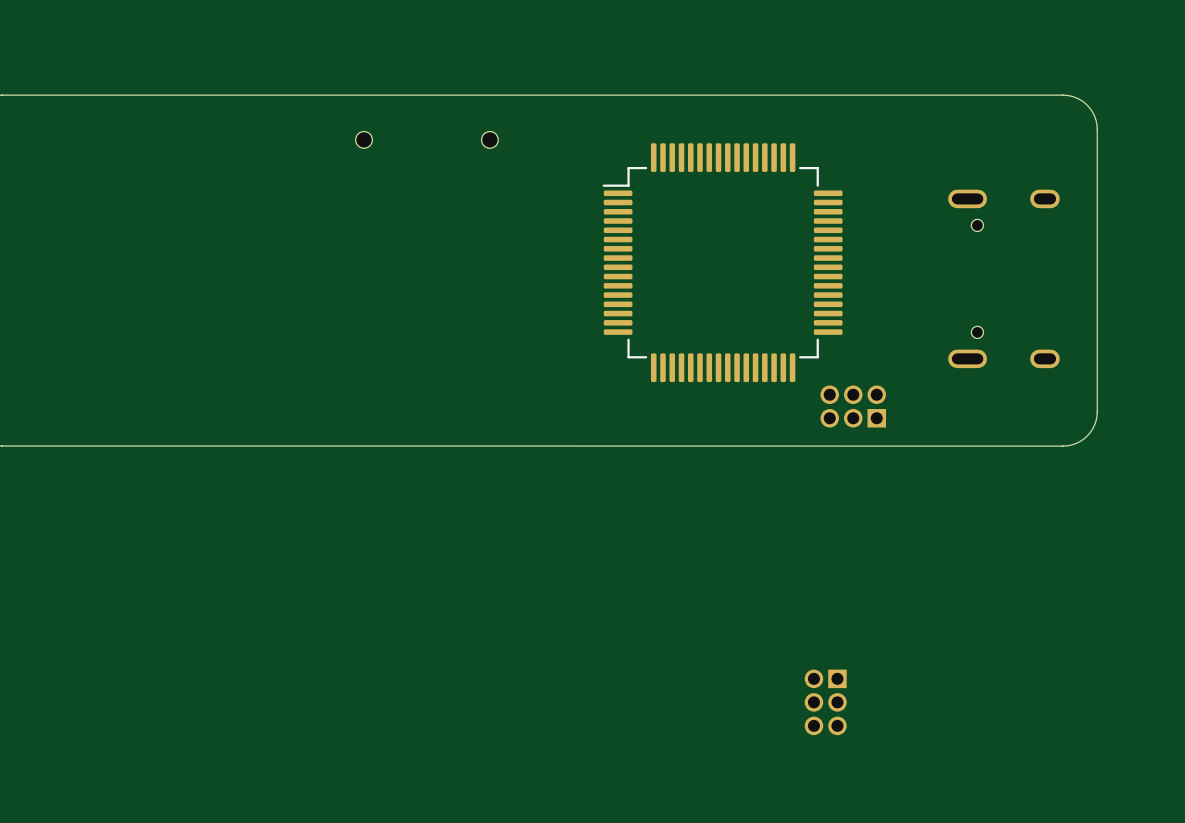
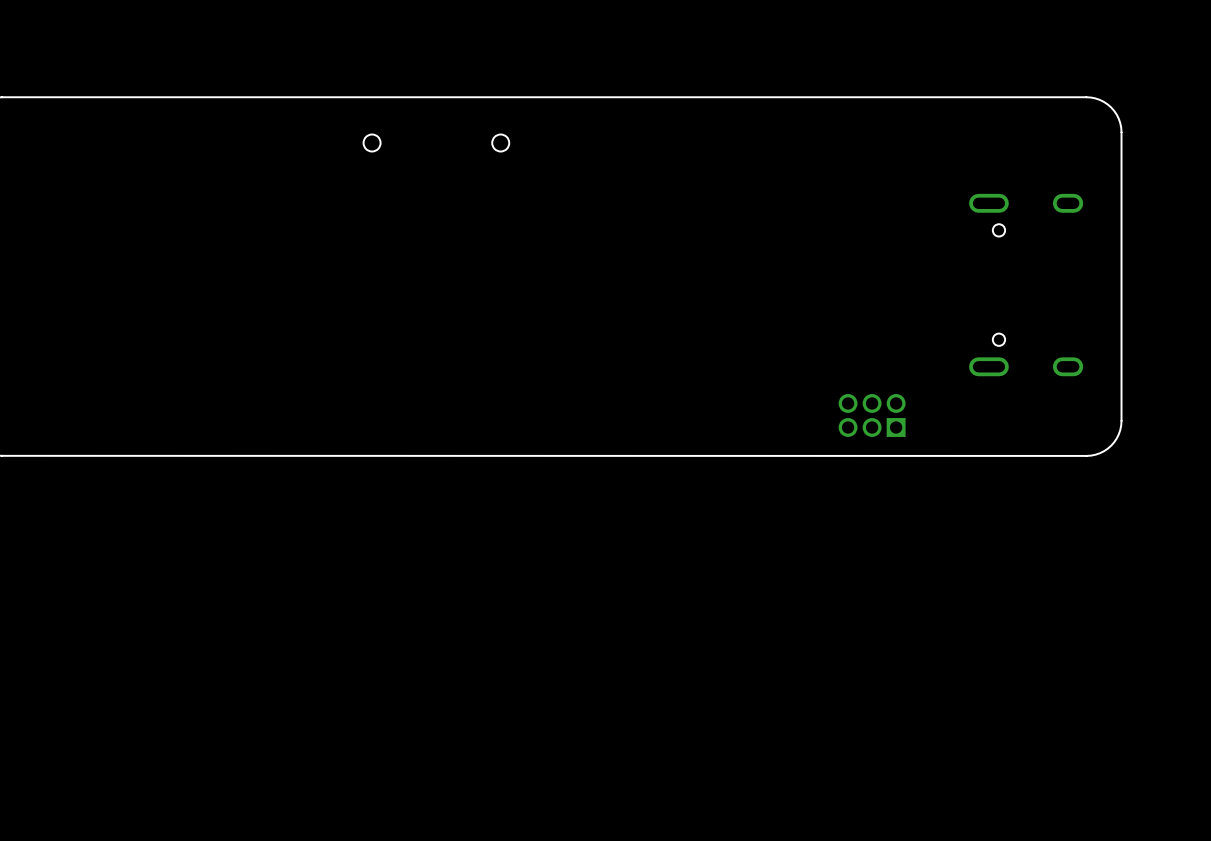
part: (722, 262) -> none
part: (825, 702) -> none

